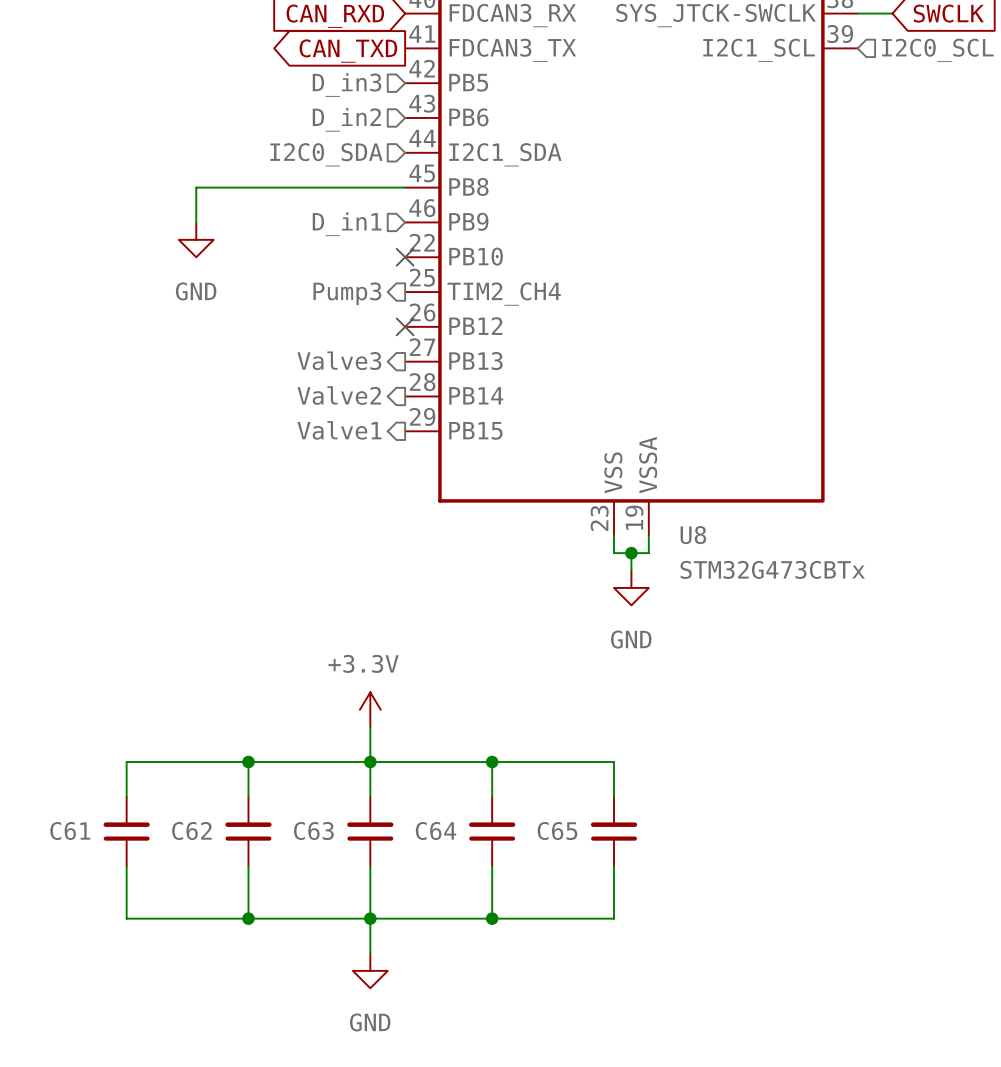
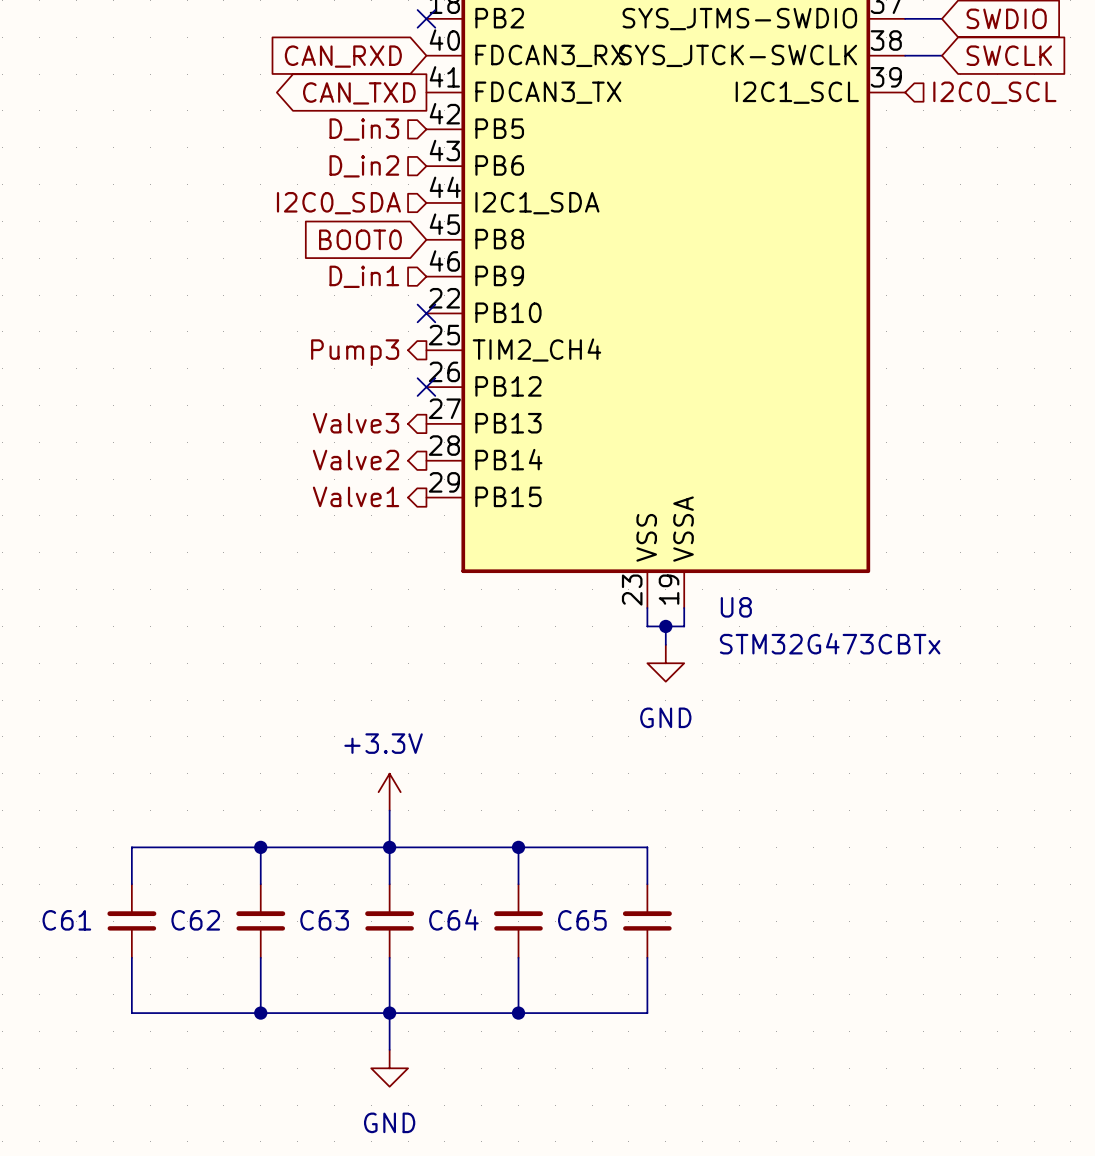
global label: none -> BOOT0 (360, 239)
wire: (405, 187) (196, 187) (196, 222) -> none
power symbol: GND (196, 239) -> none

